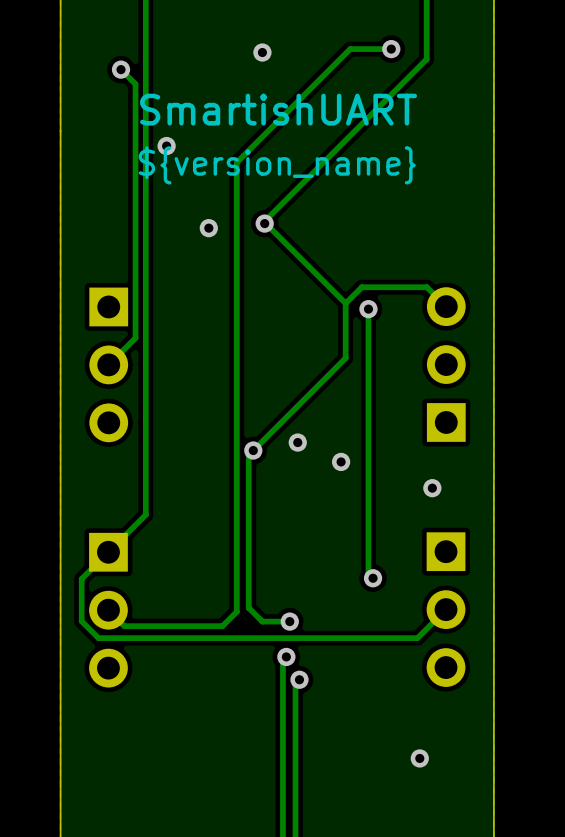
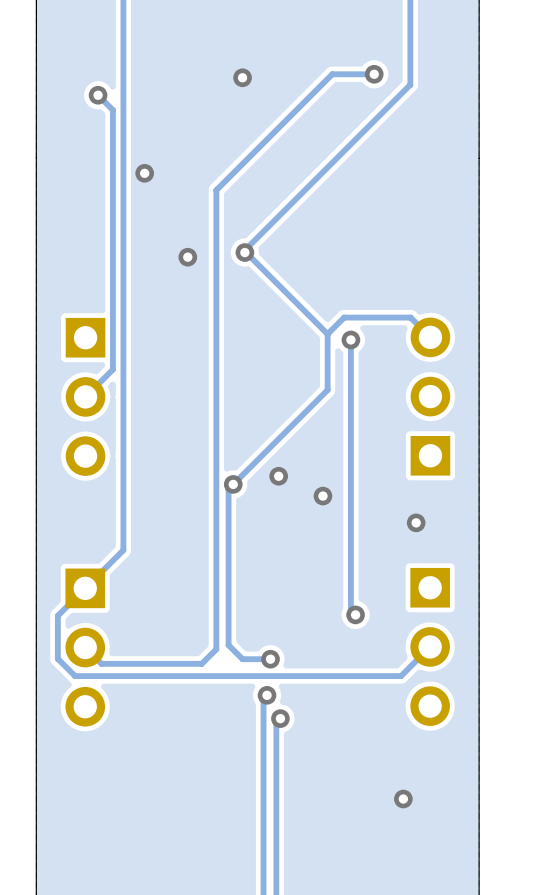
text: SmartishUART (278, 109) -> none
text: ${version_name} (277, 165) -> none

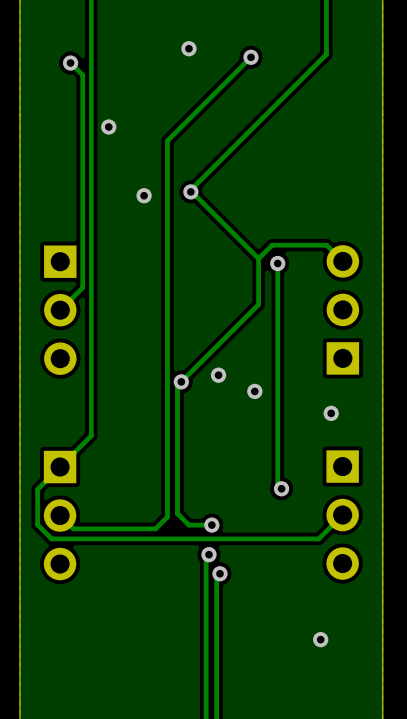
track: (374, 74) (332, 74) (318, 88) -> none
via position: (374, 74) -> (251, 57)

